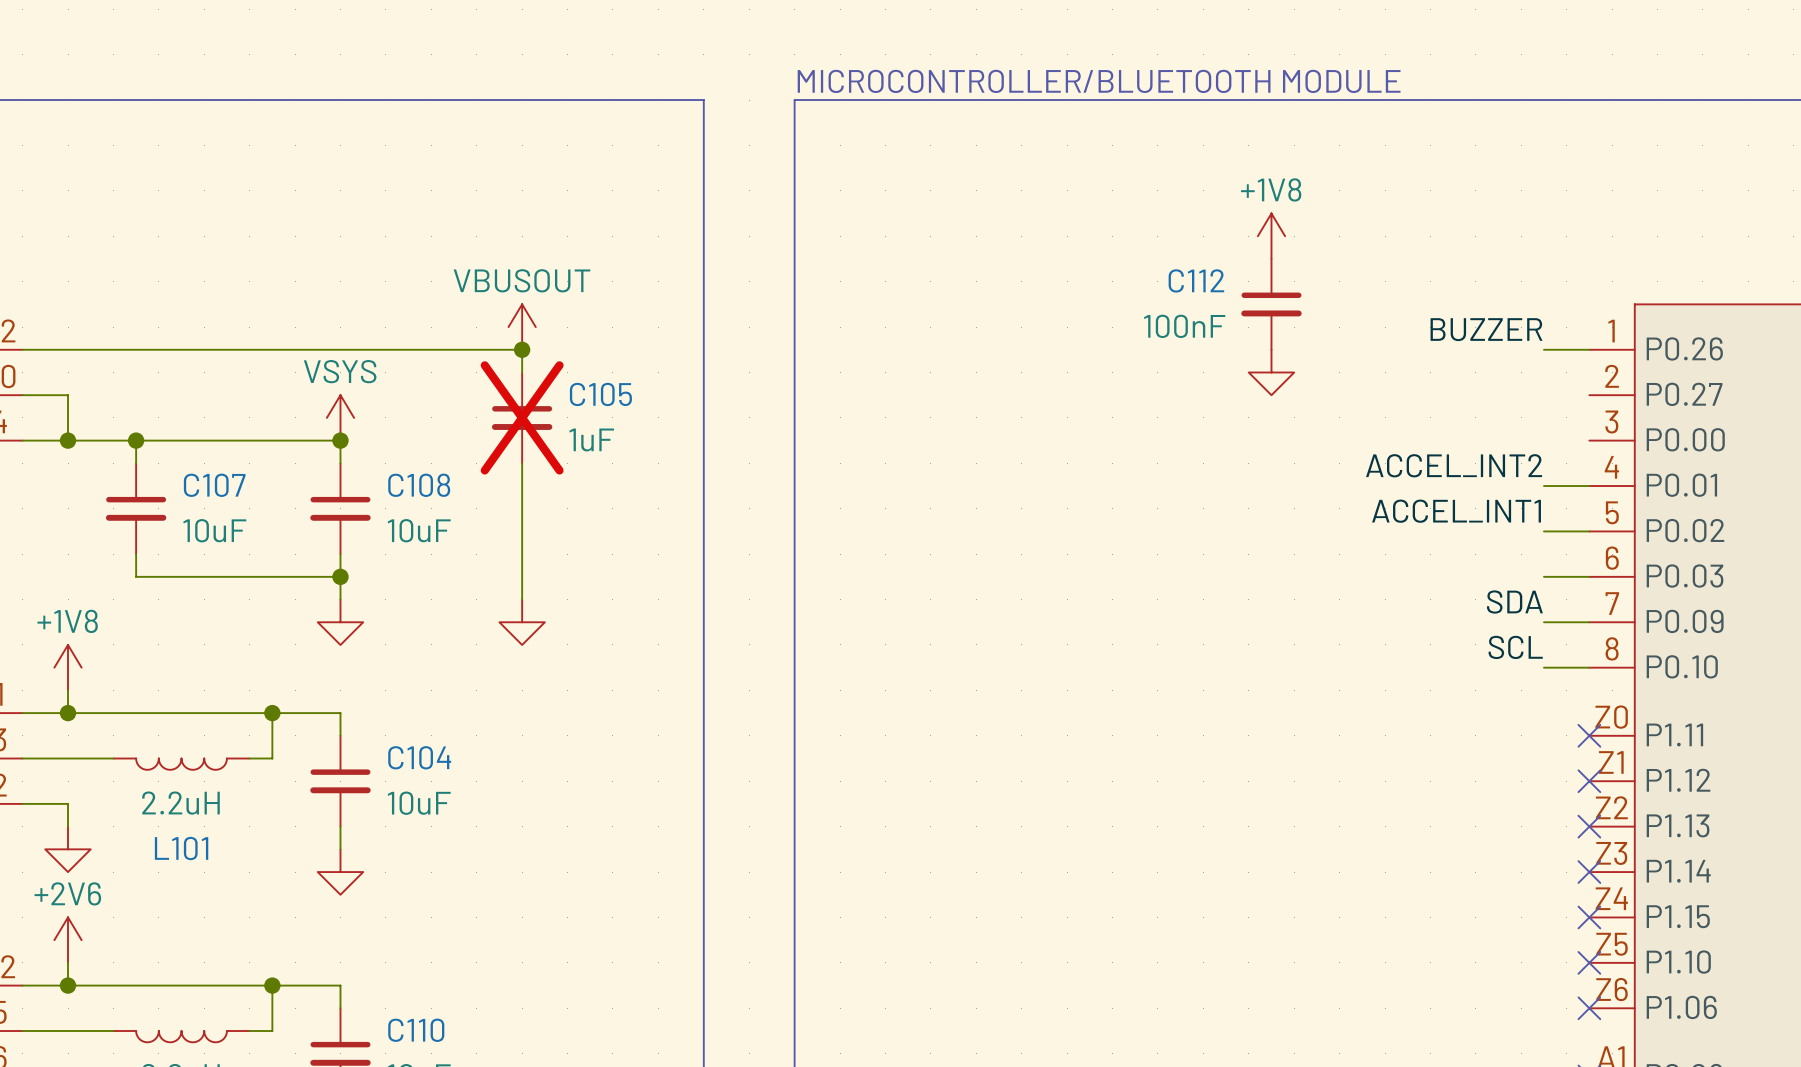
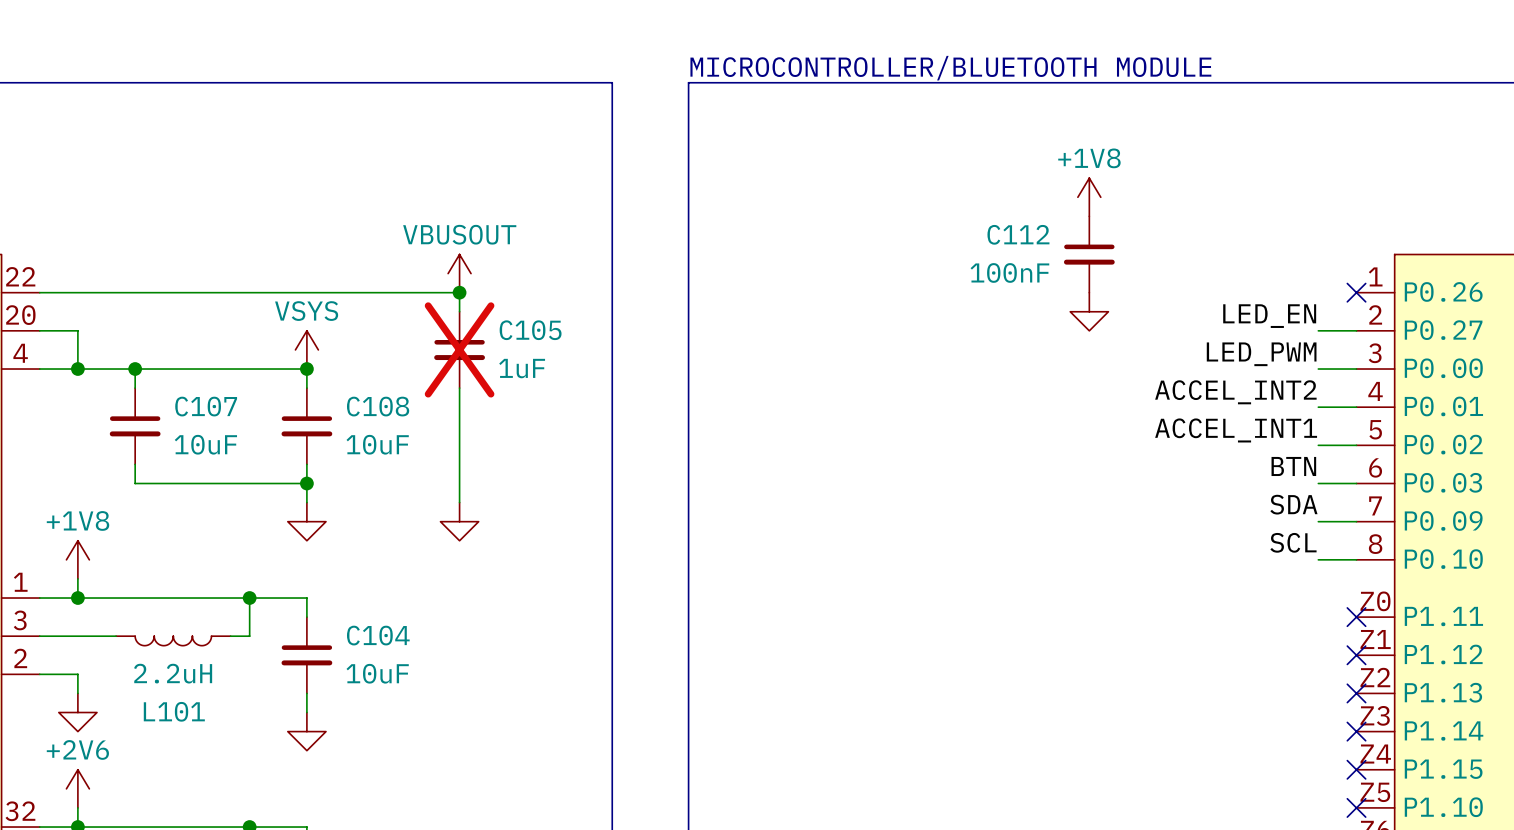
label: BUZZER (1486, 329) -> none
wire: (1543, 349) (1589, 349) -> (1318, 330) (1356, 330)
no-connect mark: none -> (1356, 292)
label: none -> LED_EN (1269, 316)
label: none -> LED_PWM (1261, 354)
wire: none -> (1318, 369) (1356, 369)
label: none -> BTN (1293, 466)

